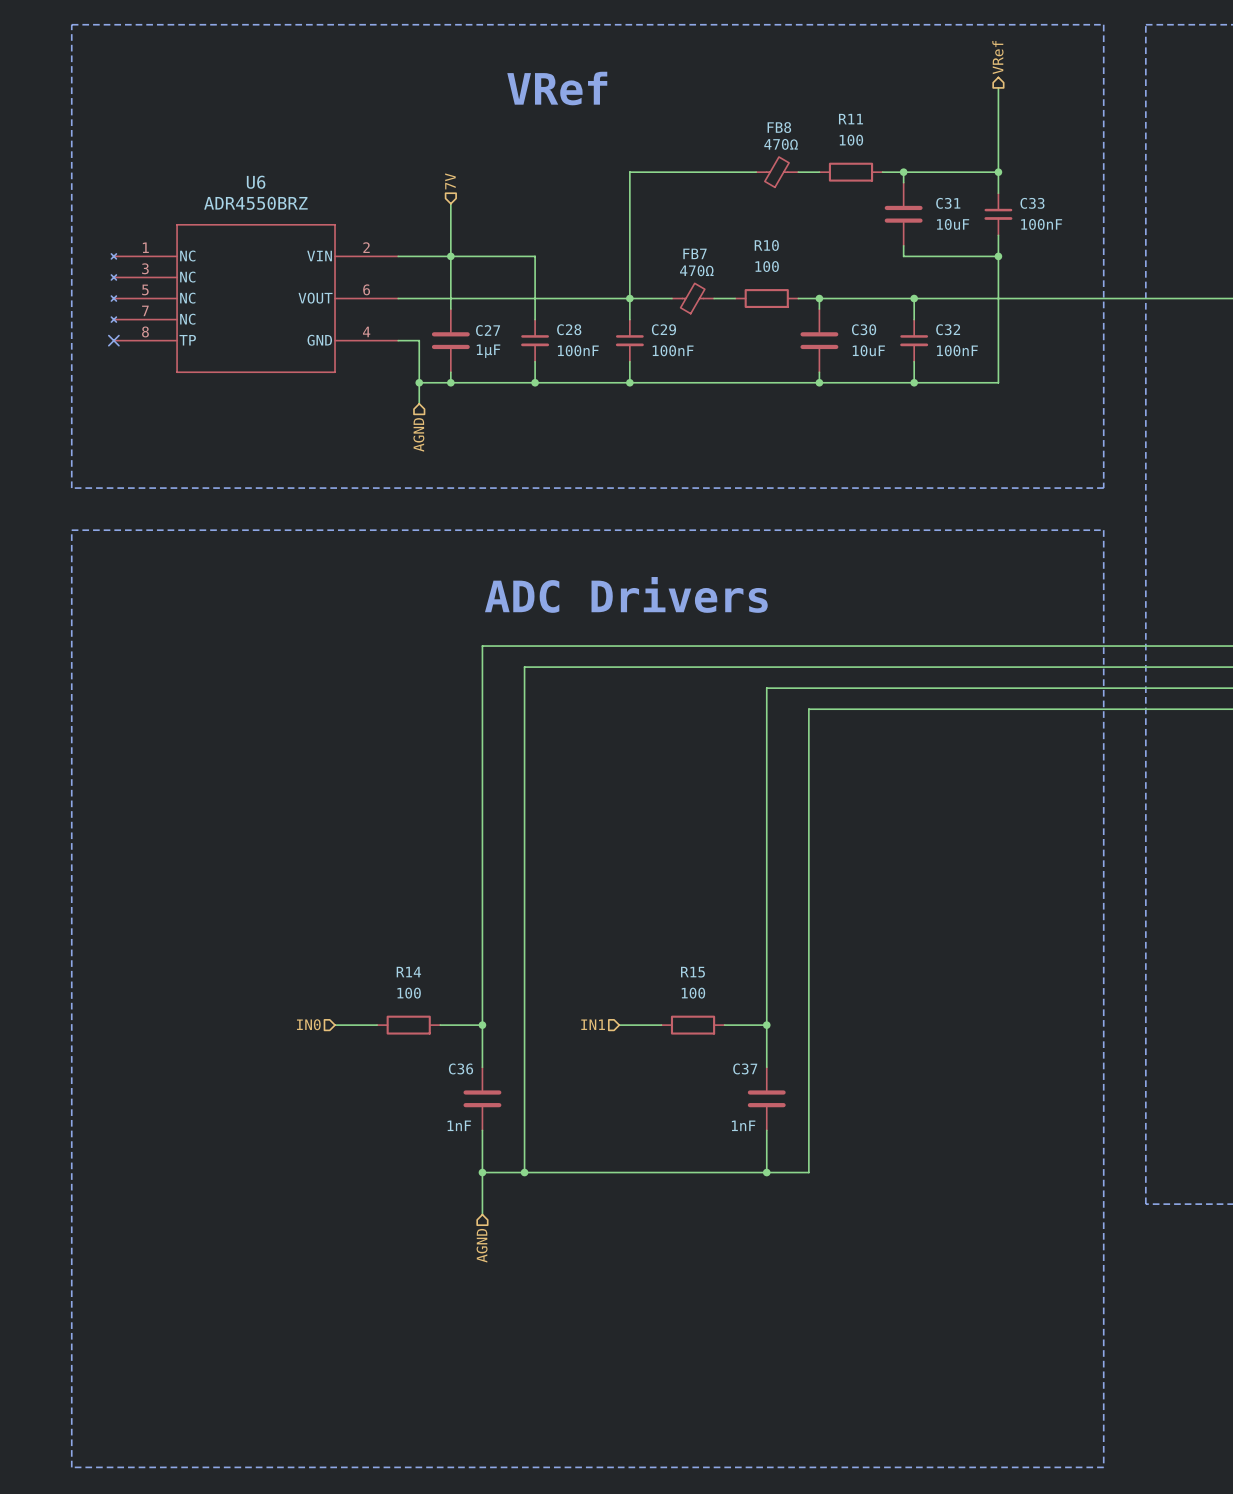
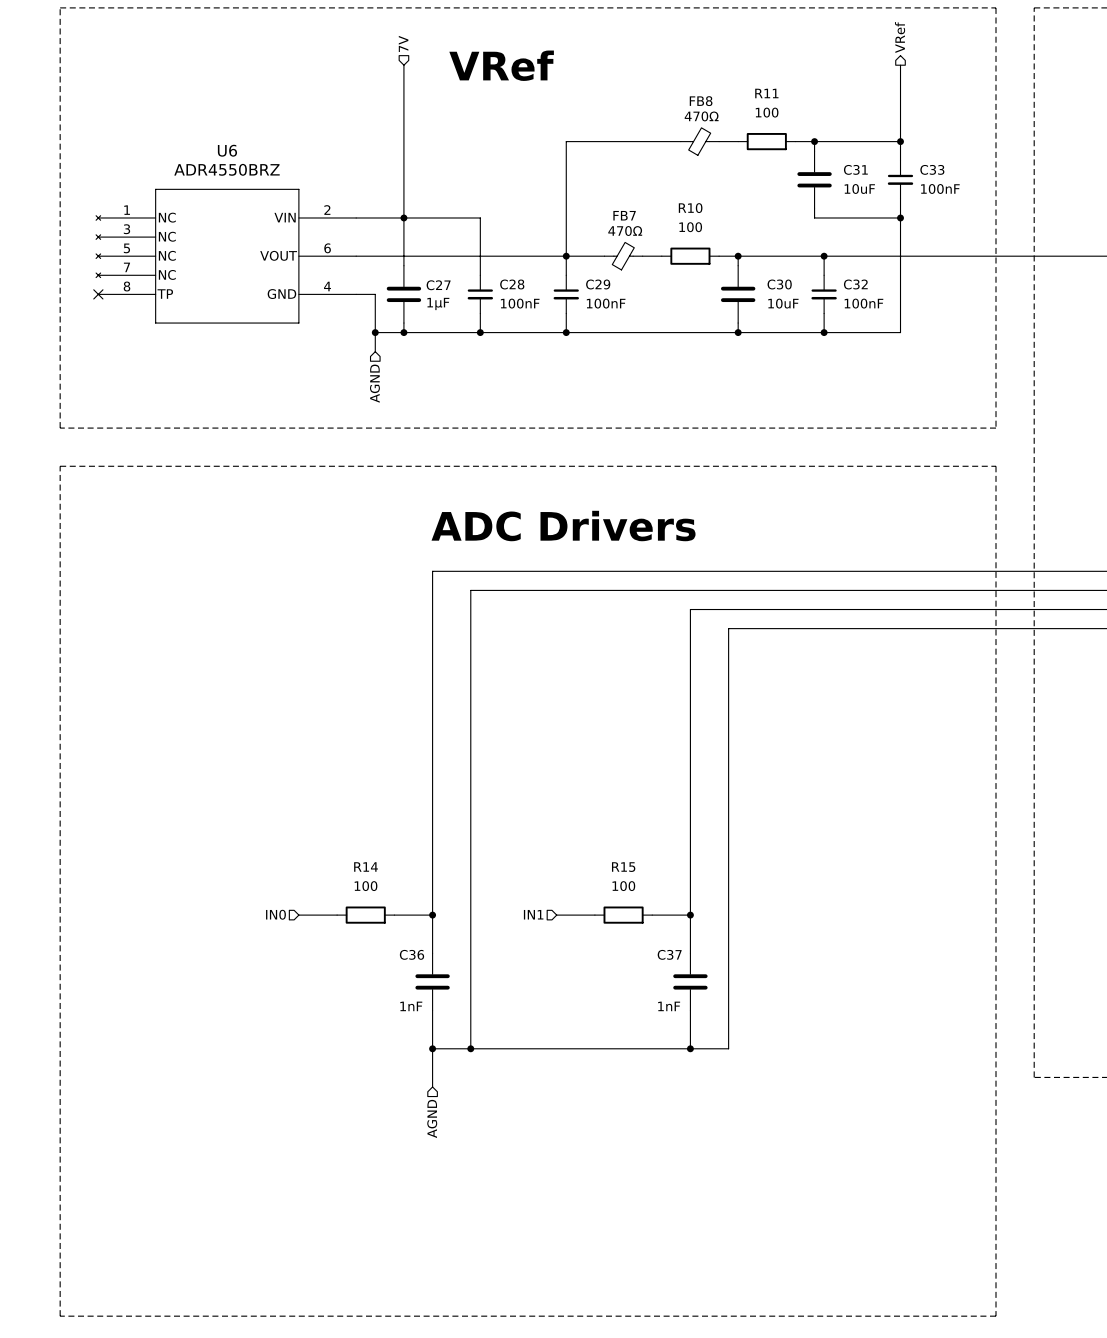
wire: none -> (403, 65) (403, 170)
hierarchical label position: 7V (450, 181) -> 7V (403, 43)

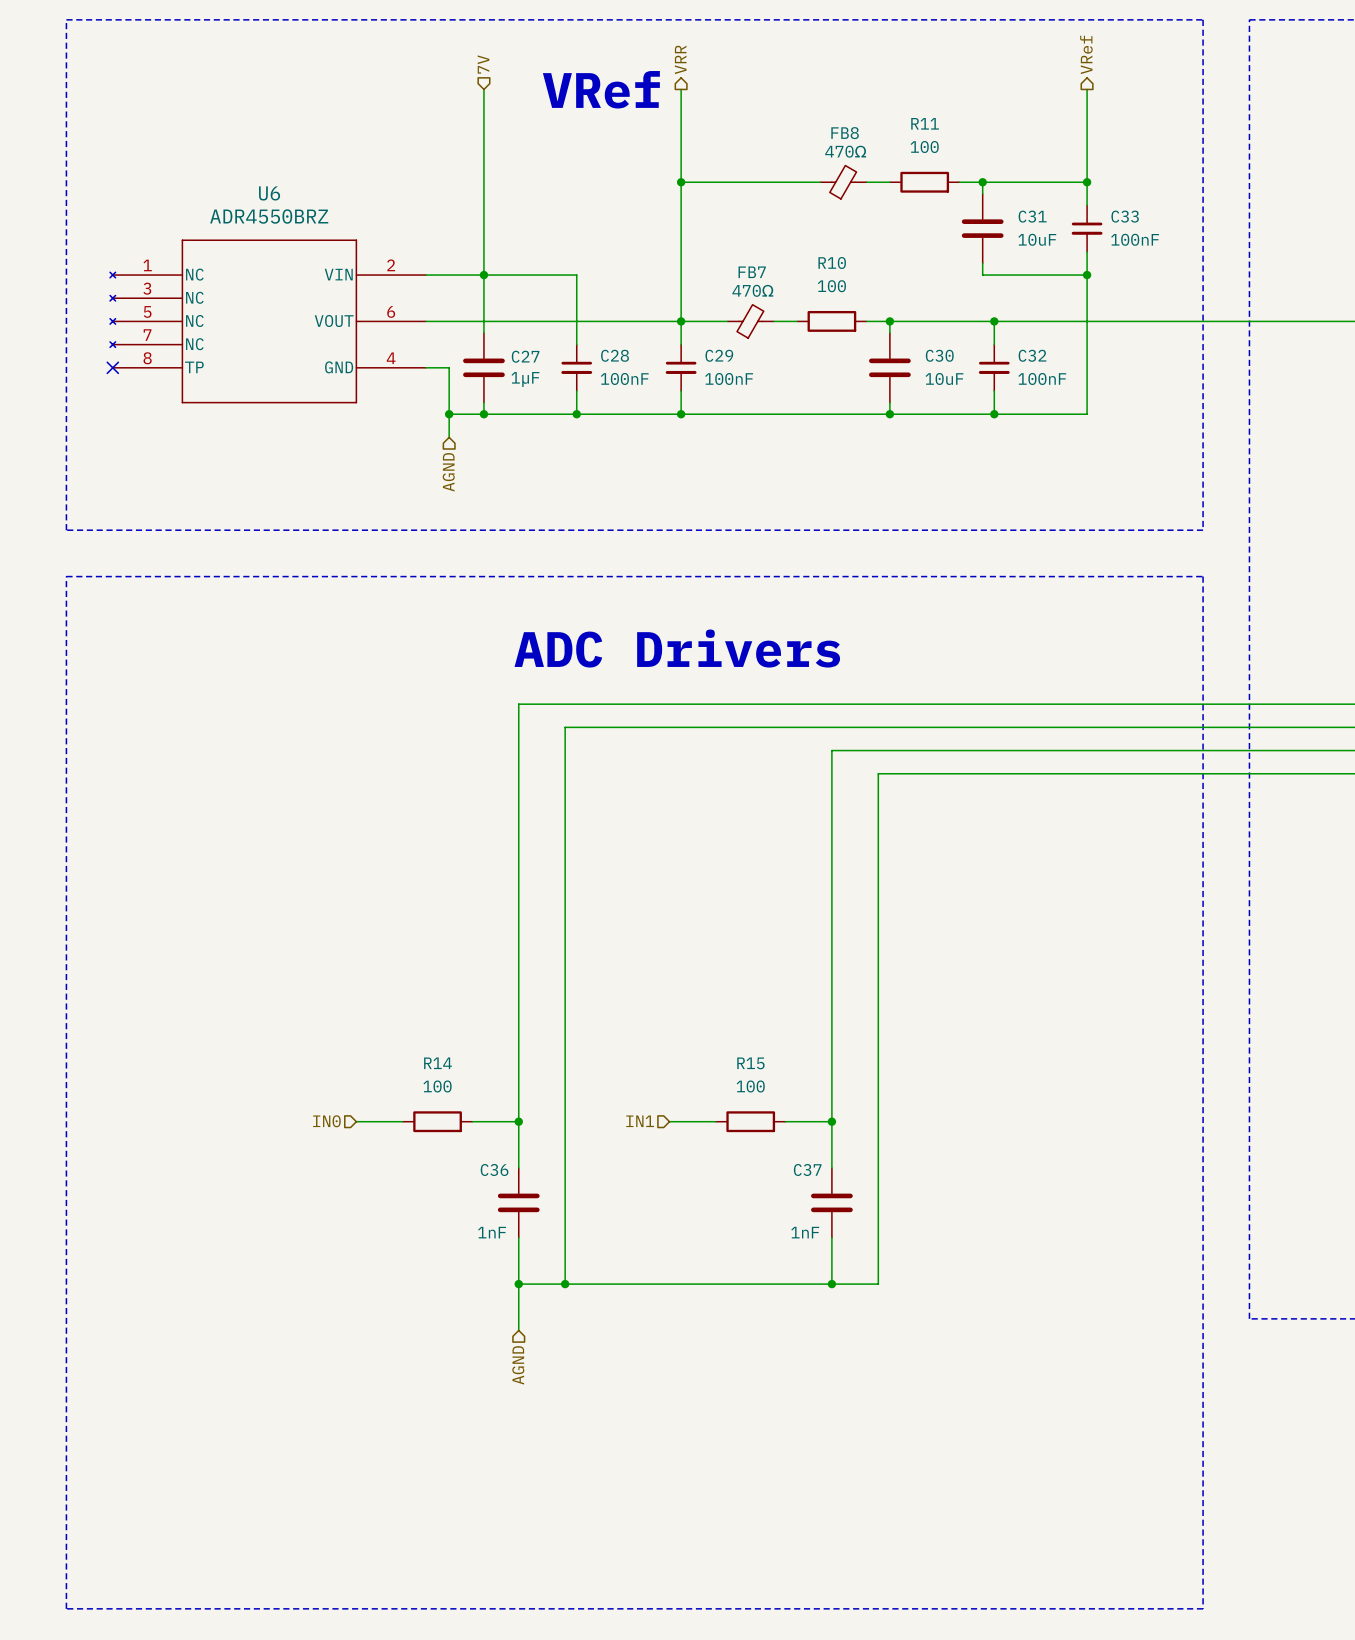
hierarchical label: none -> VRR (680, 59)
wire: none -> (681, 89) (681, 182)
junction: none -> (681, 182)

